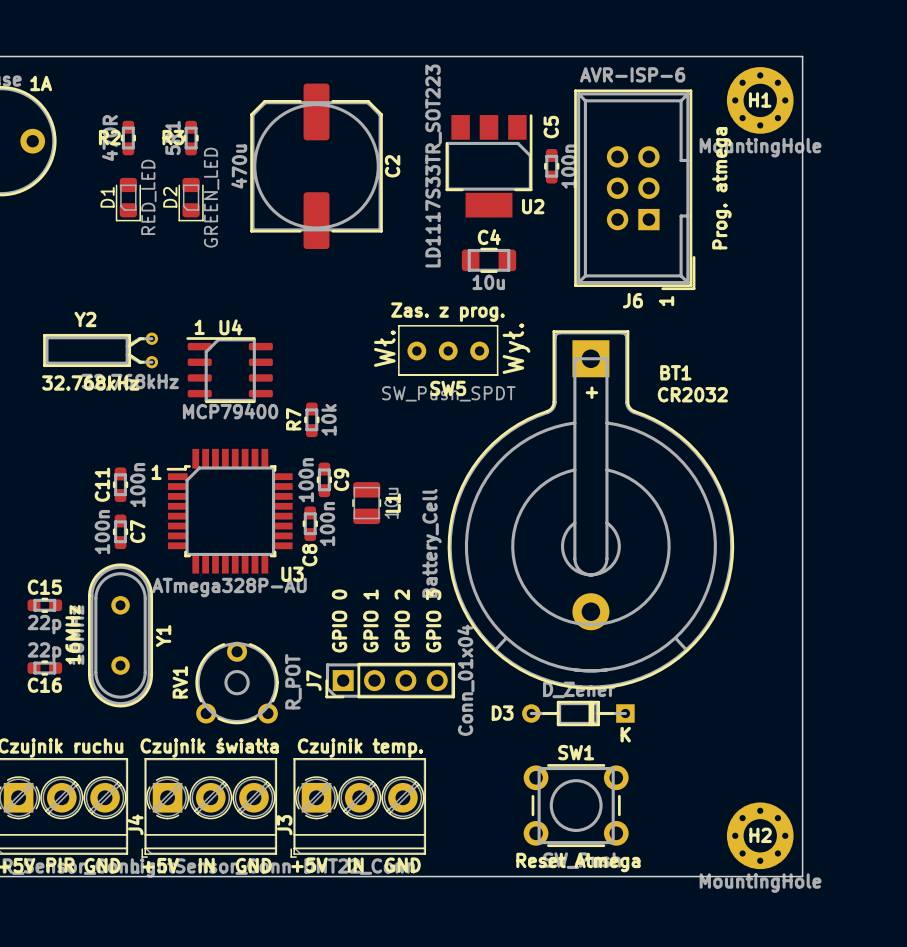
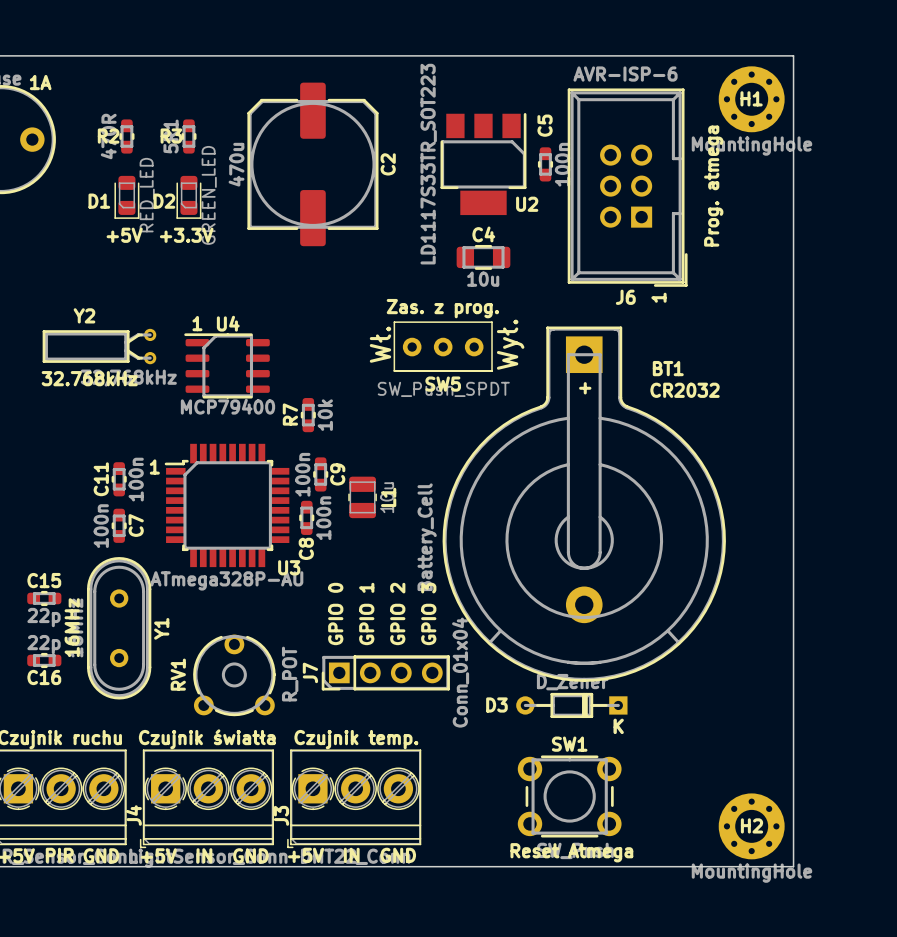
D1 name rotation: 0° (107, 197) -> 90° clockwise (99, 201)
D2 name rotation: 0° (170, 197) -> 90° clockwise (164, 201)
text: none -> +5V (124, 235)
text: none -> +3.3V (186, 235)

